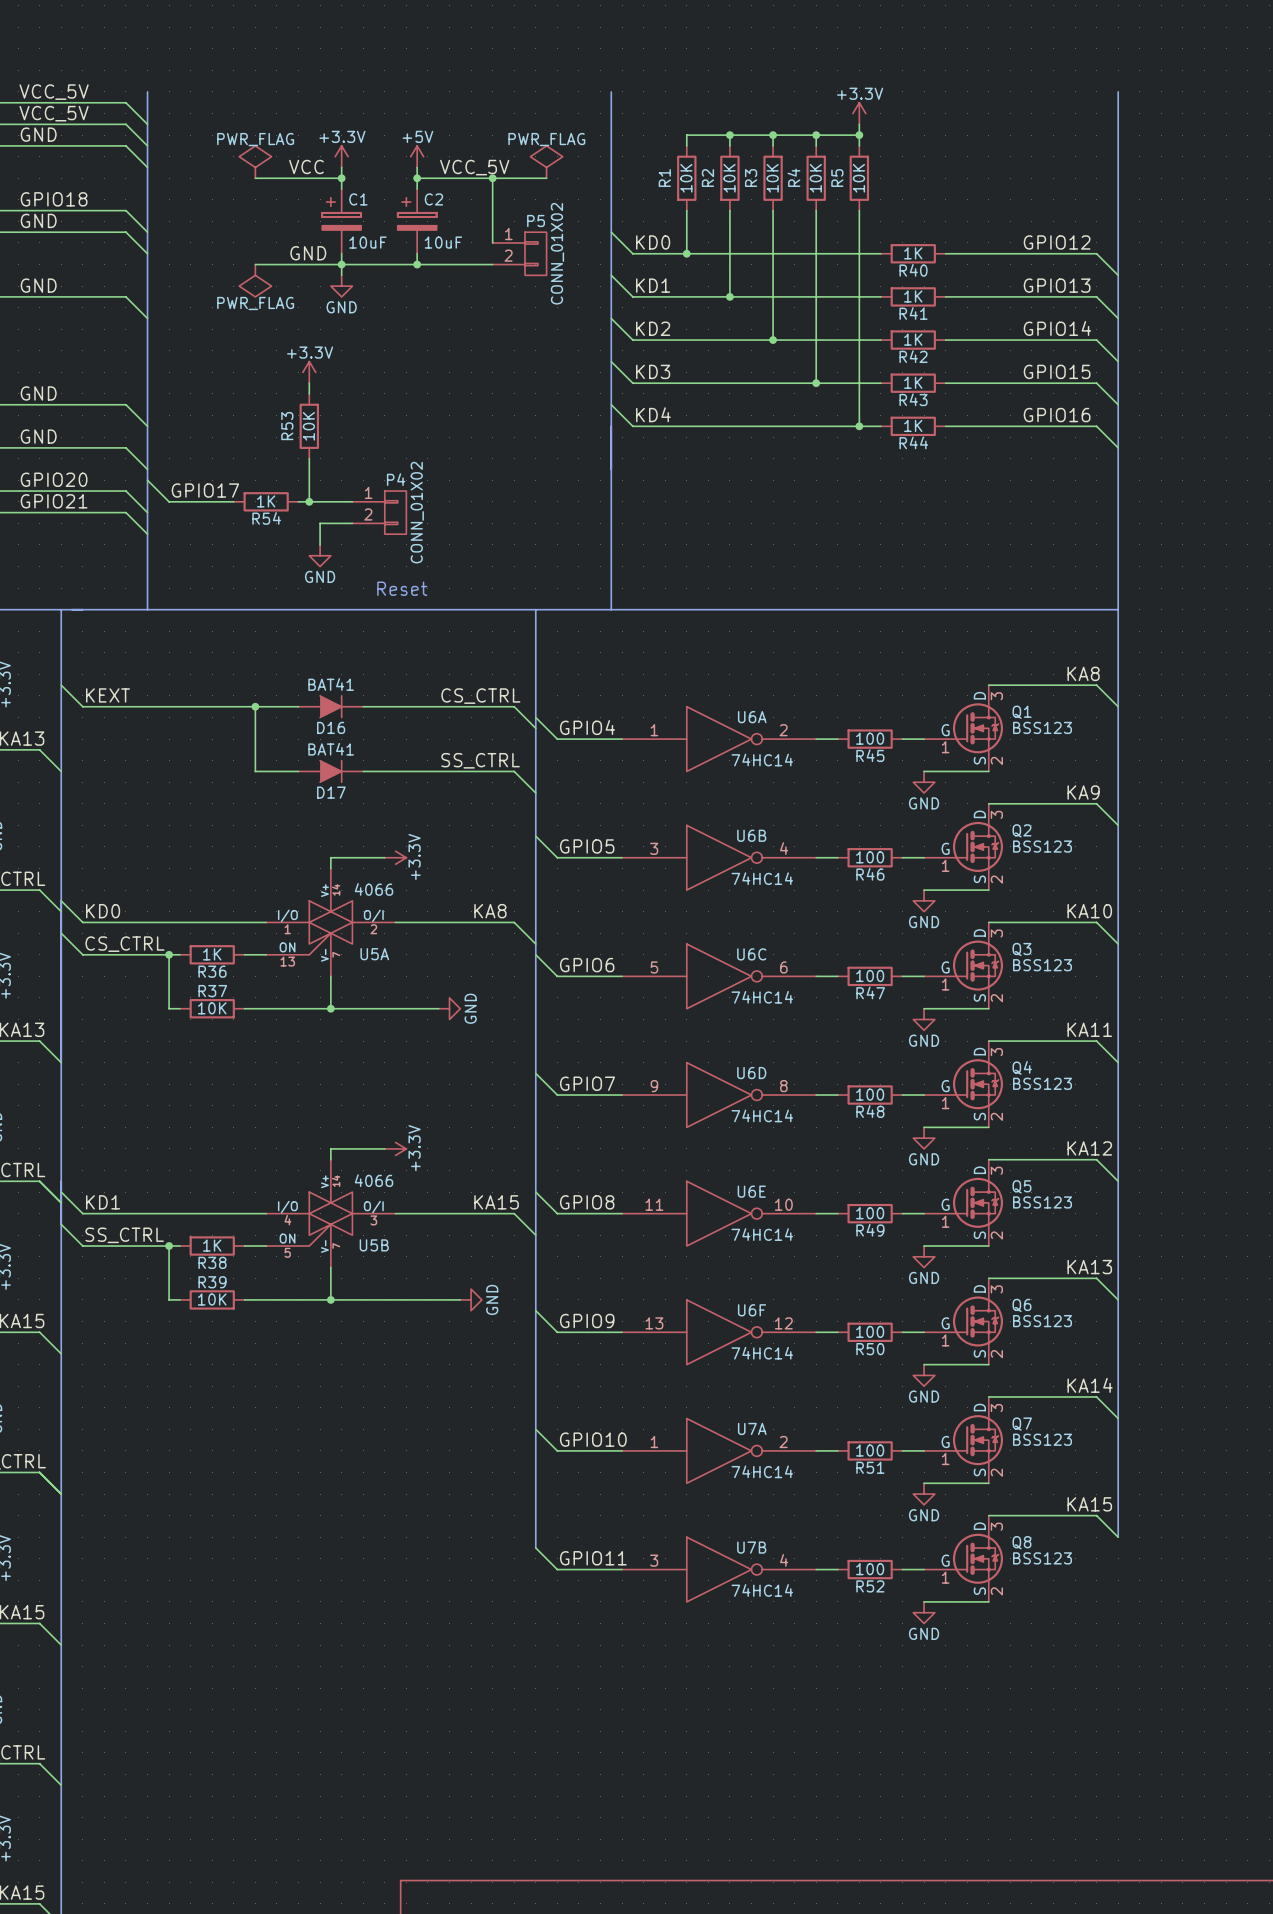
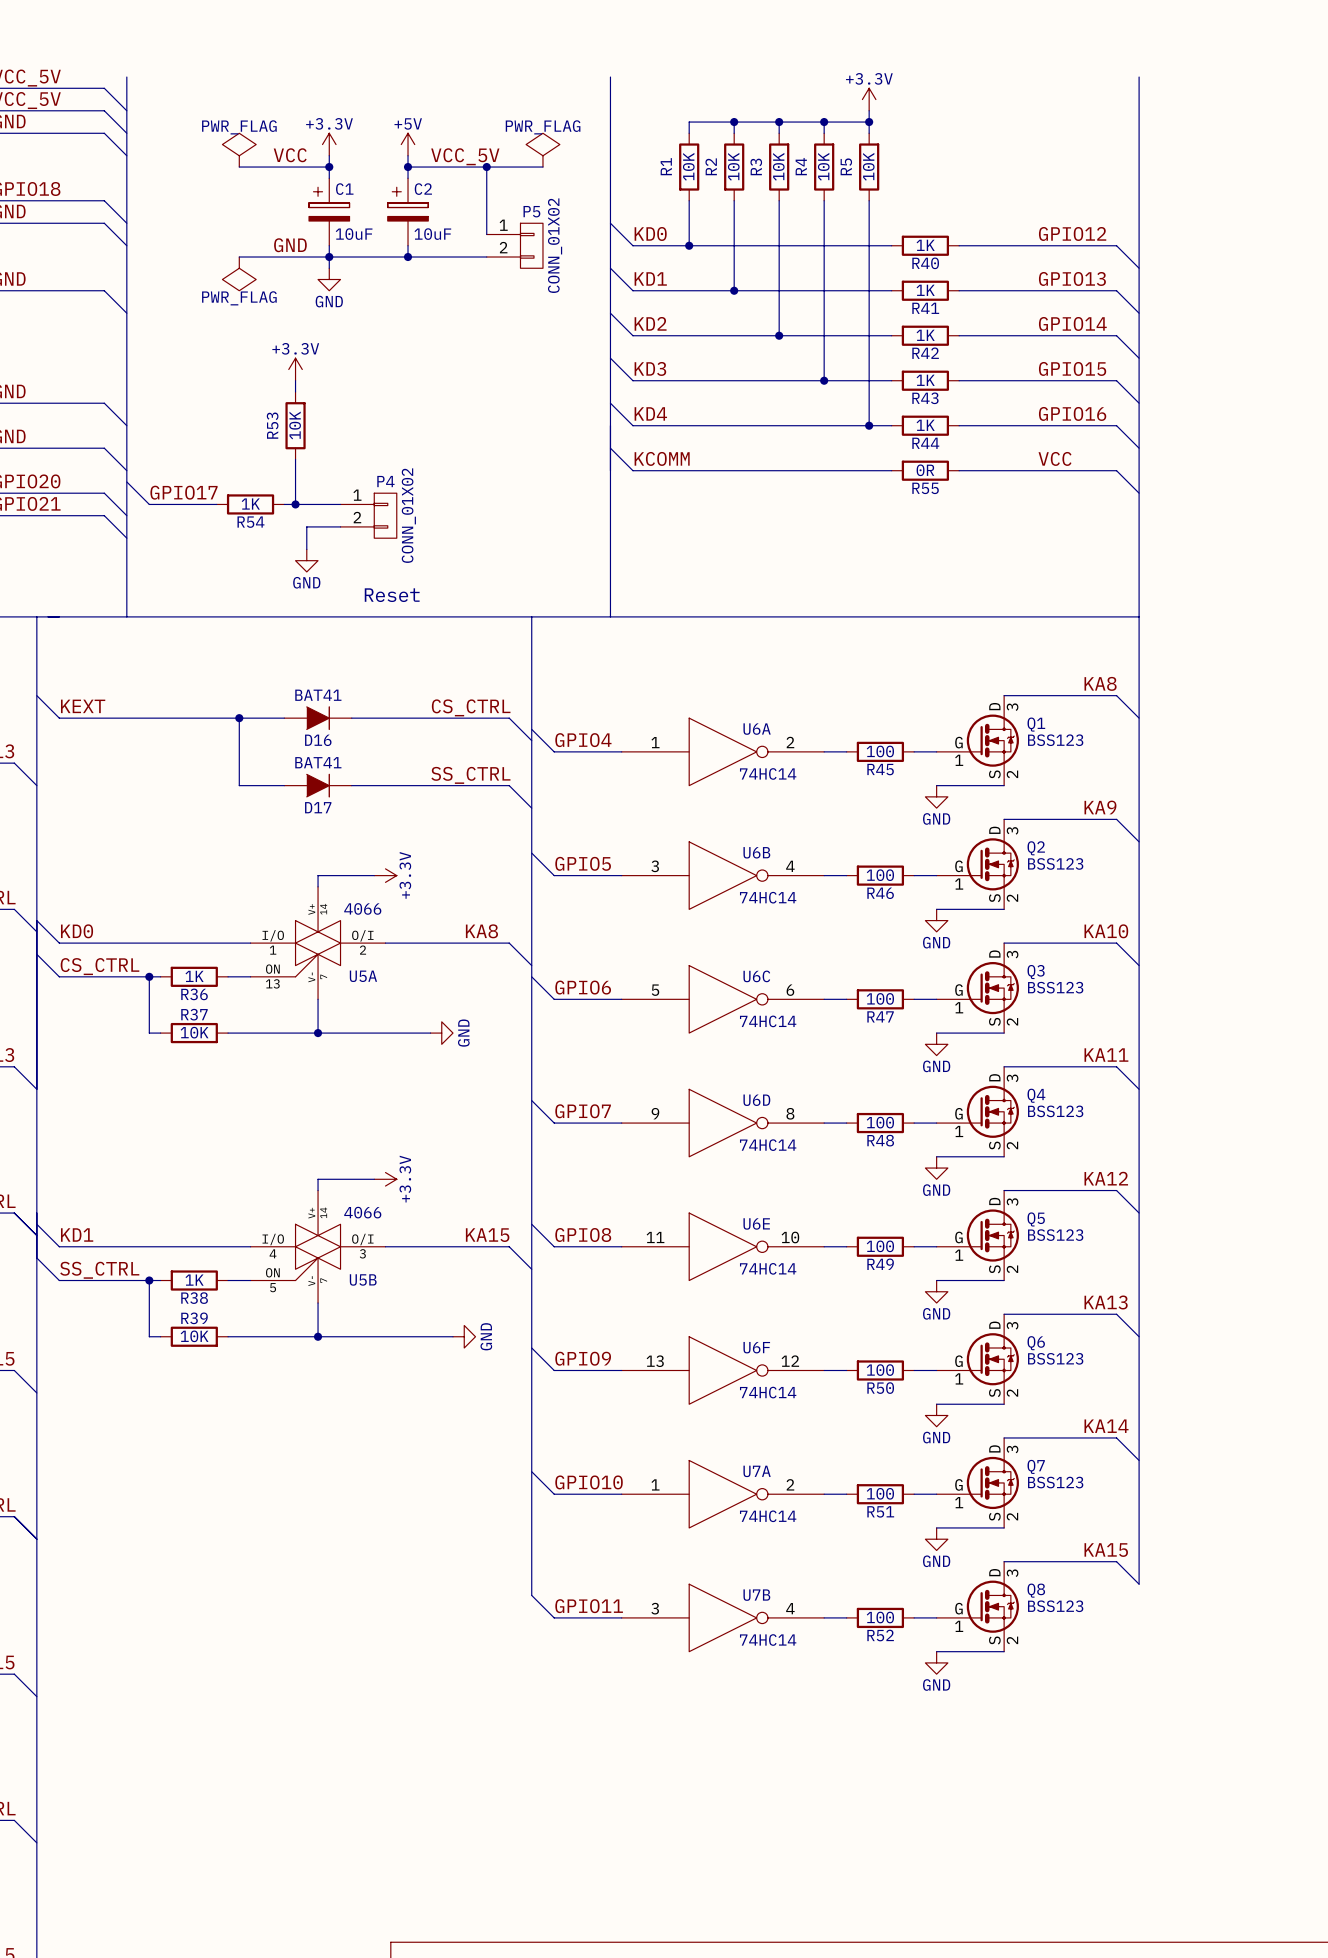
wire: none -> (610, 448) (632, 470) (891, 470)
label: none -> KCOMM (662, 458)
label: none -> VCC (1055, 458)
R55: none -> 0R (925, 470)
wire: none -> (959, 470) (1116, 470) (1139, 493)

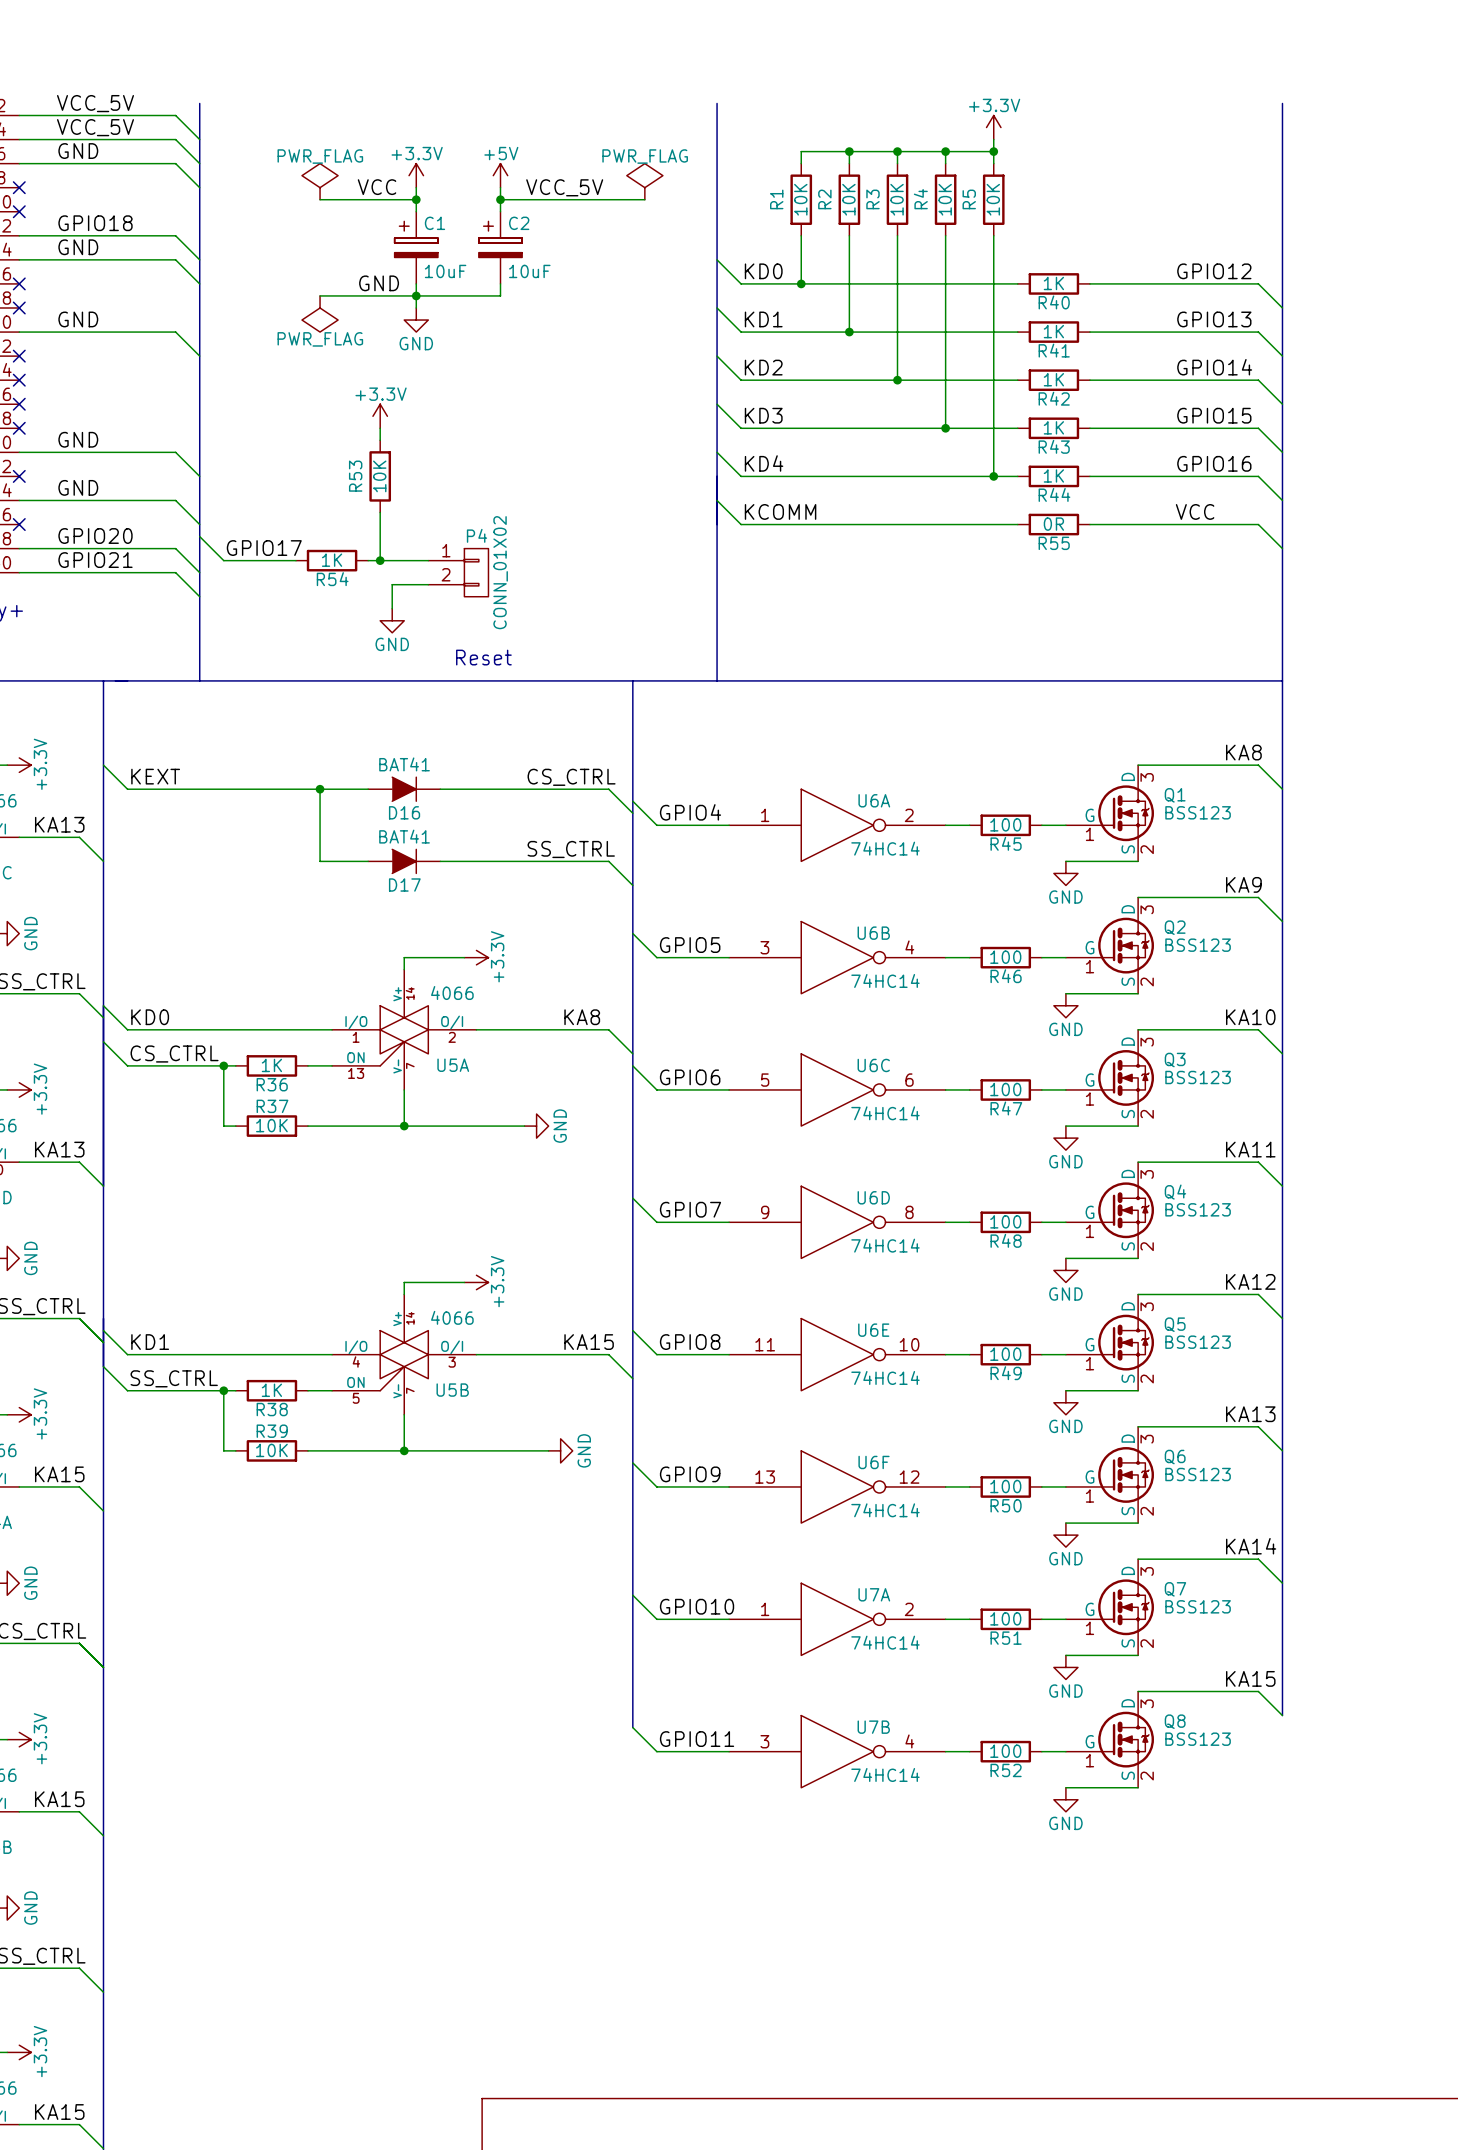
wire: (486, 167) (486, 234) -> none
junction: (486, 167) -> none
P5: CONN_01X02 (514, 245) -> none
wire: (408, 257) (486, 257) -> none
junction: (408, 257) -> none

